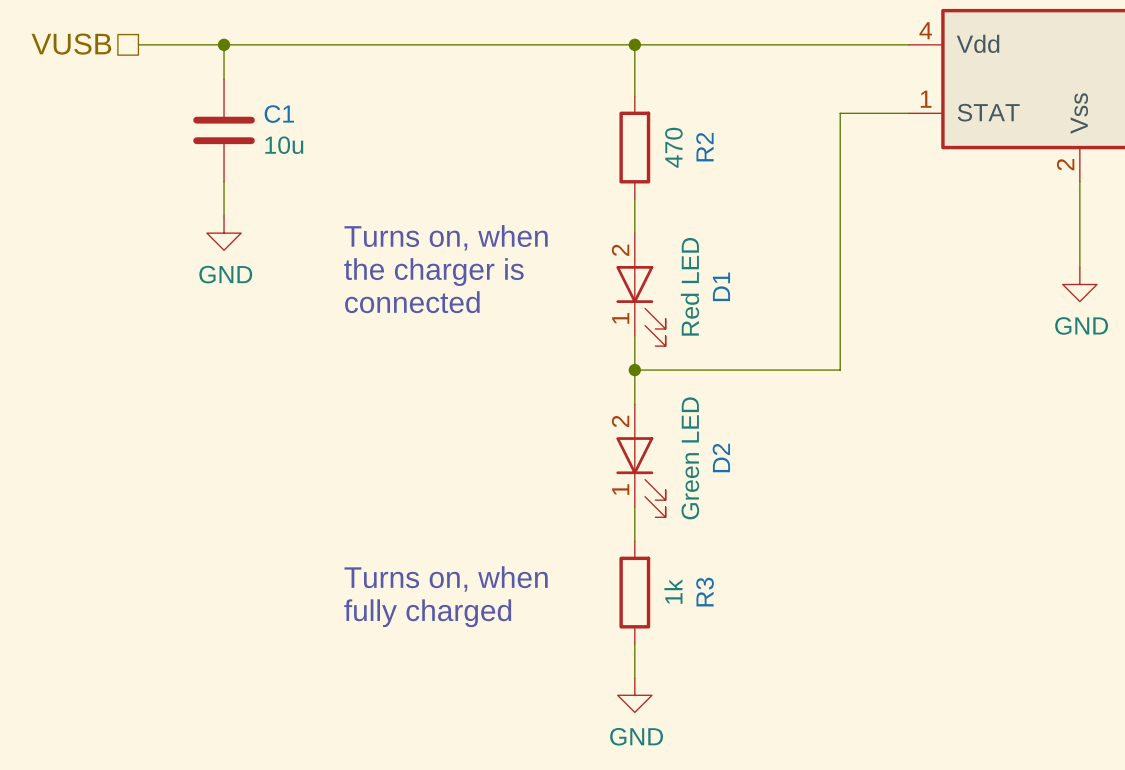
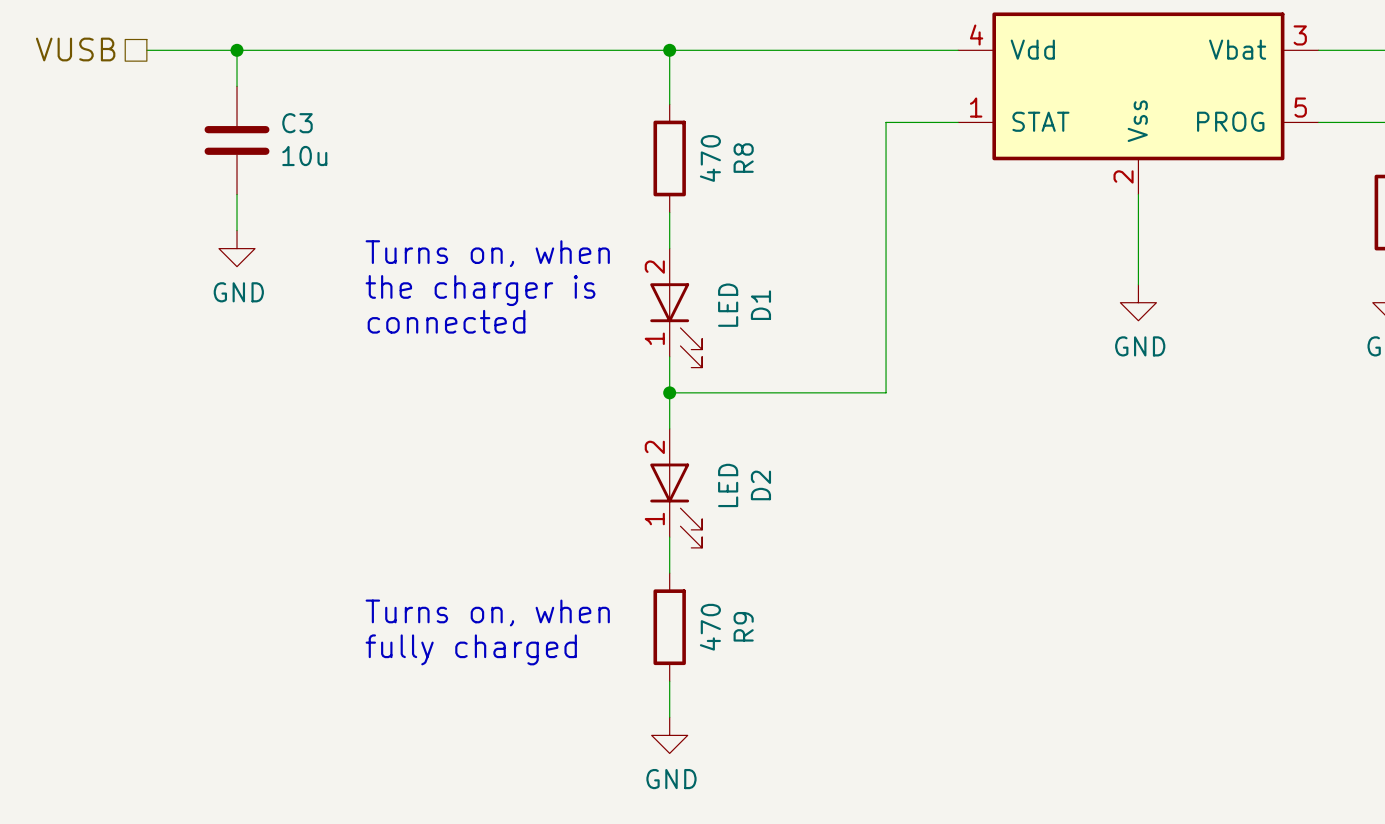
C1 name: C1 (279, 114) -> C3 (297, 123)
R2 name: R2 (704, 147) -> R8 (743, 158)
D1 value: Red LED (689, 286) -> LED (728, 305)
D2 value: Green LED (690, 458) -> LED (728, 485)
R3 value: 1k (673, 591) -> 470 (710, 627)
R3 name: R3 (705, 592) -> R9 (743, 626)

